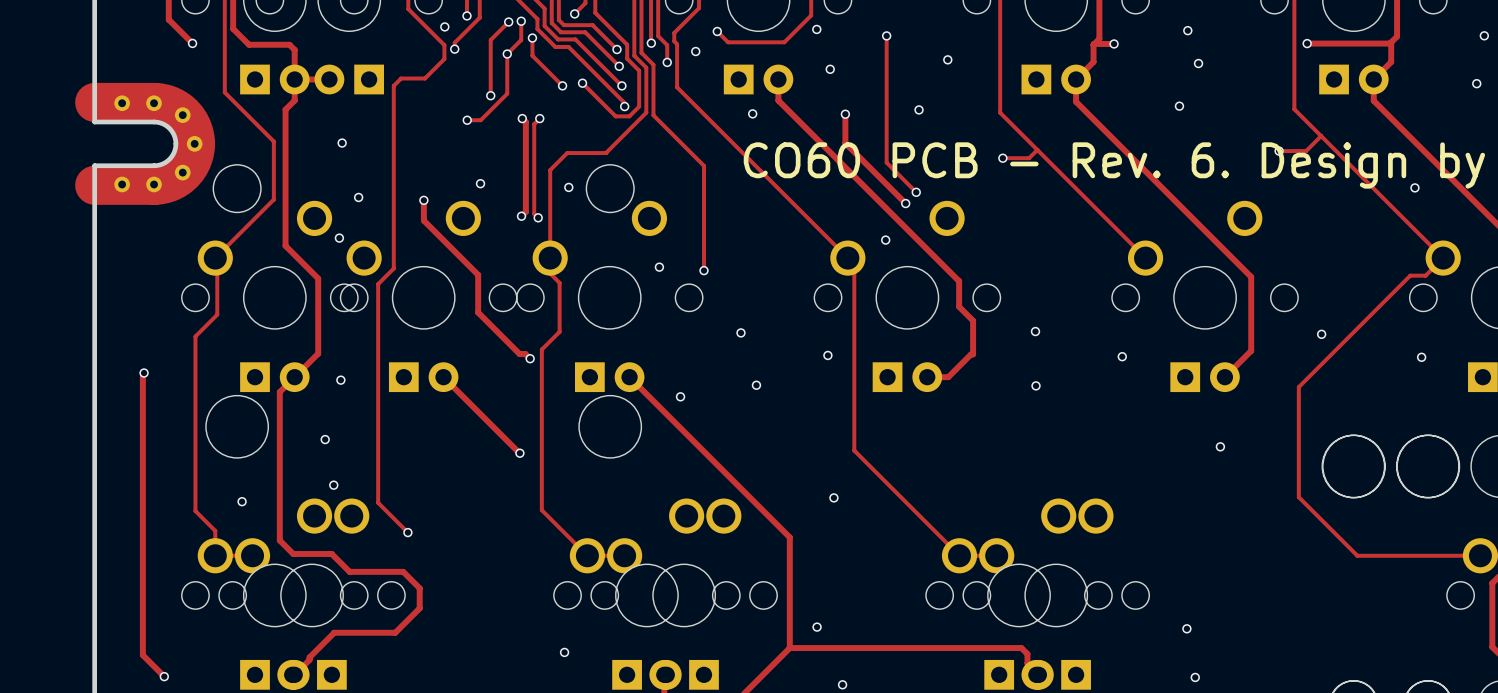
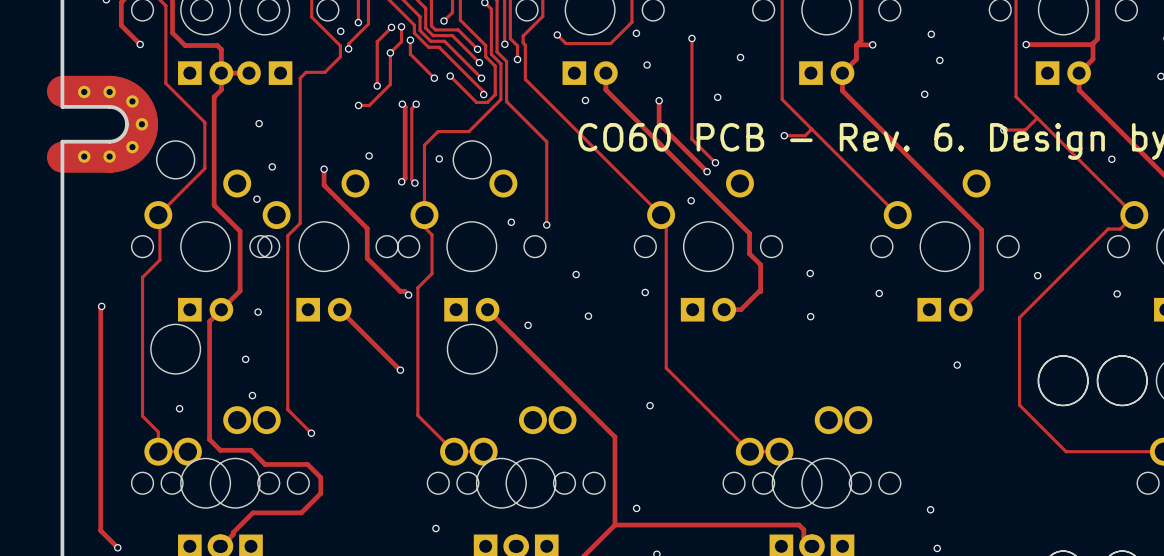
via: (695, 51) -> none

